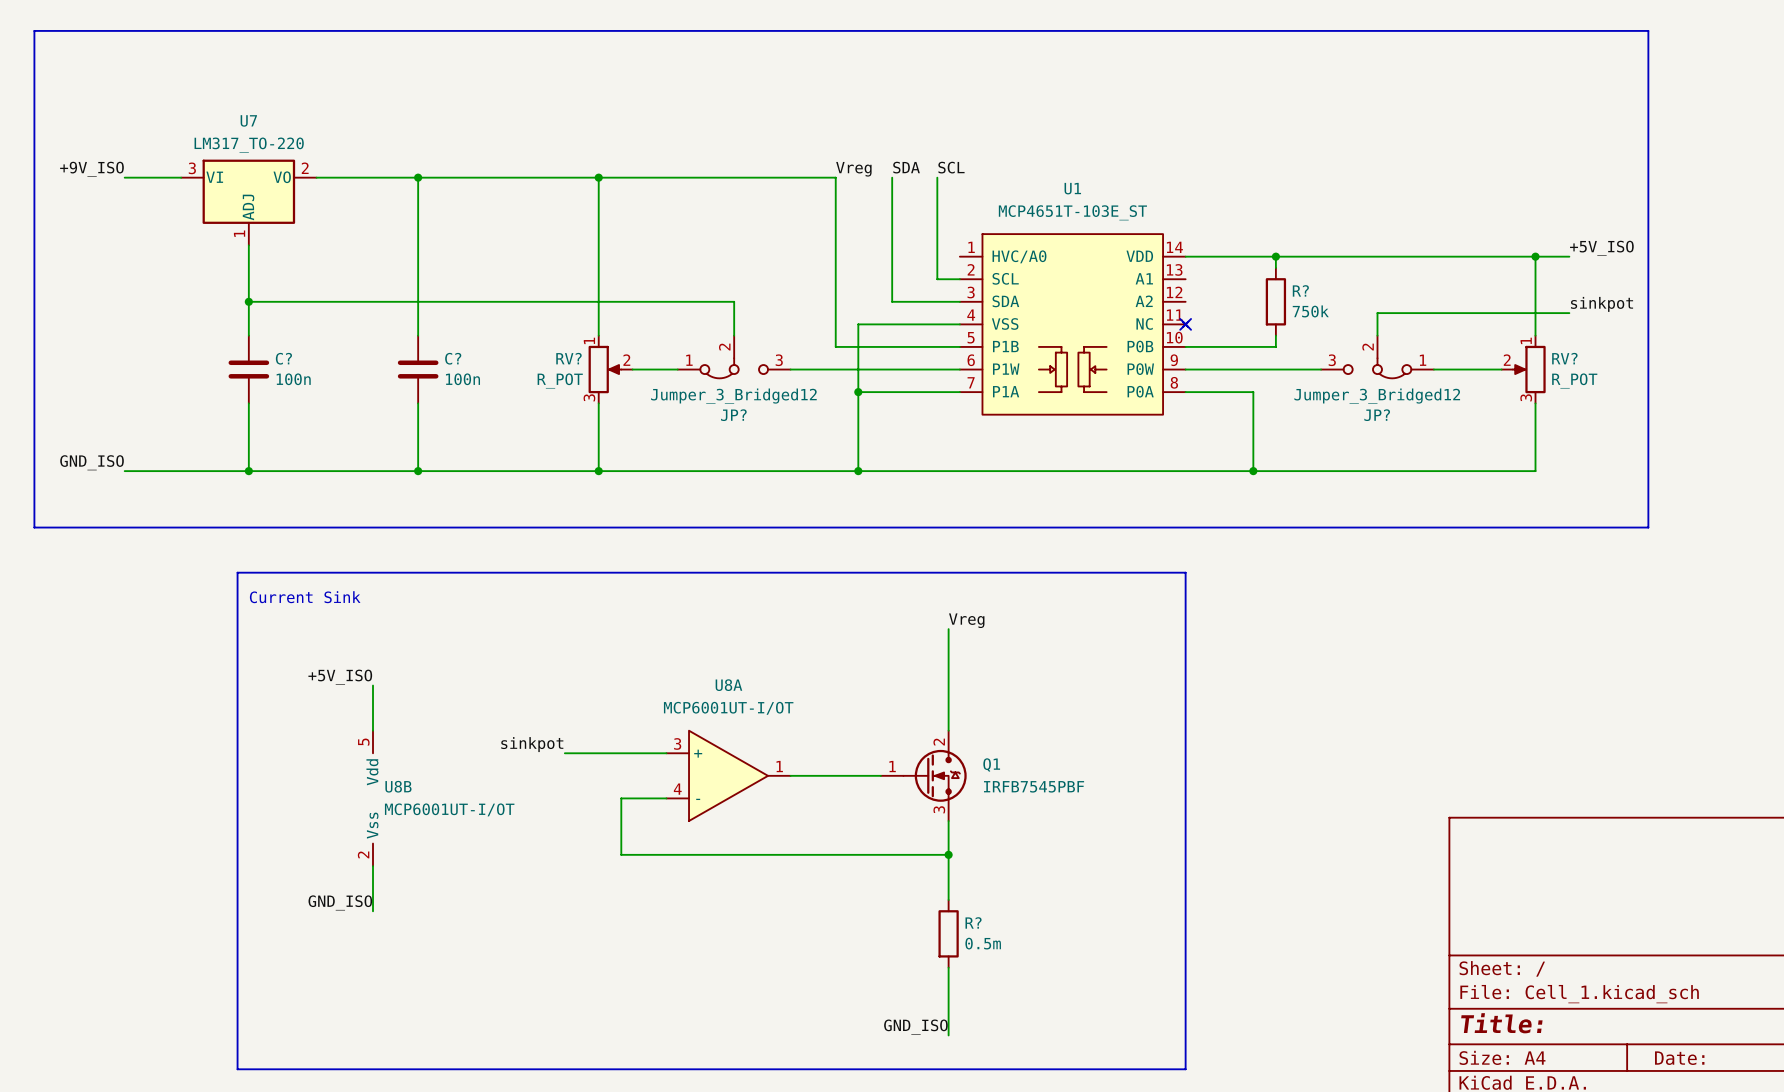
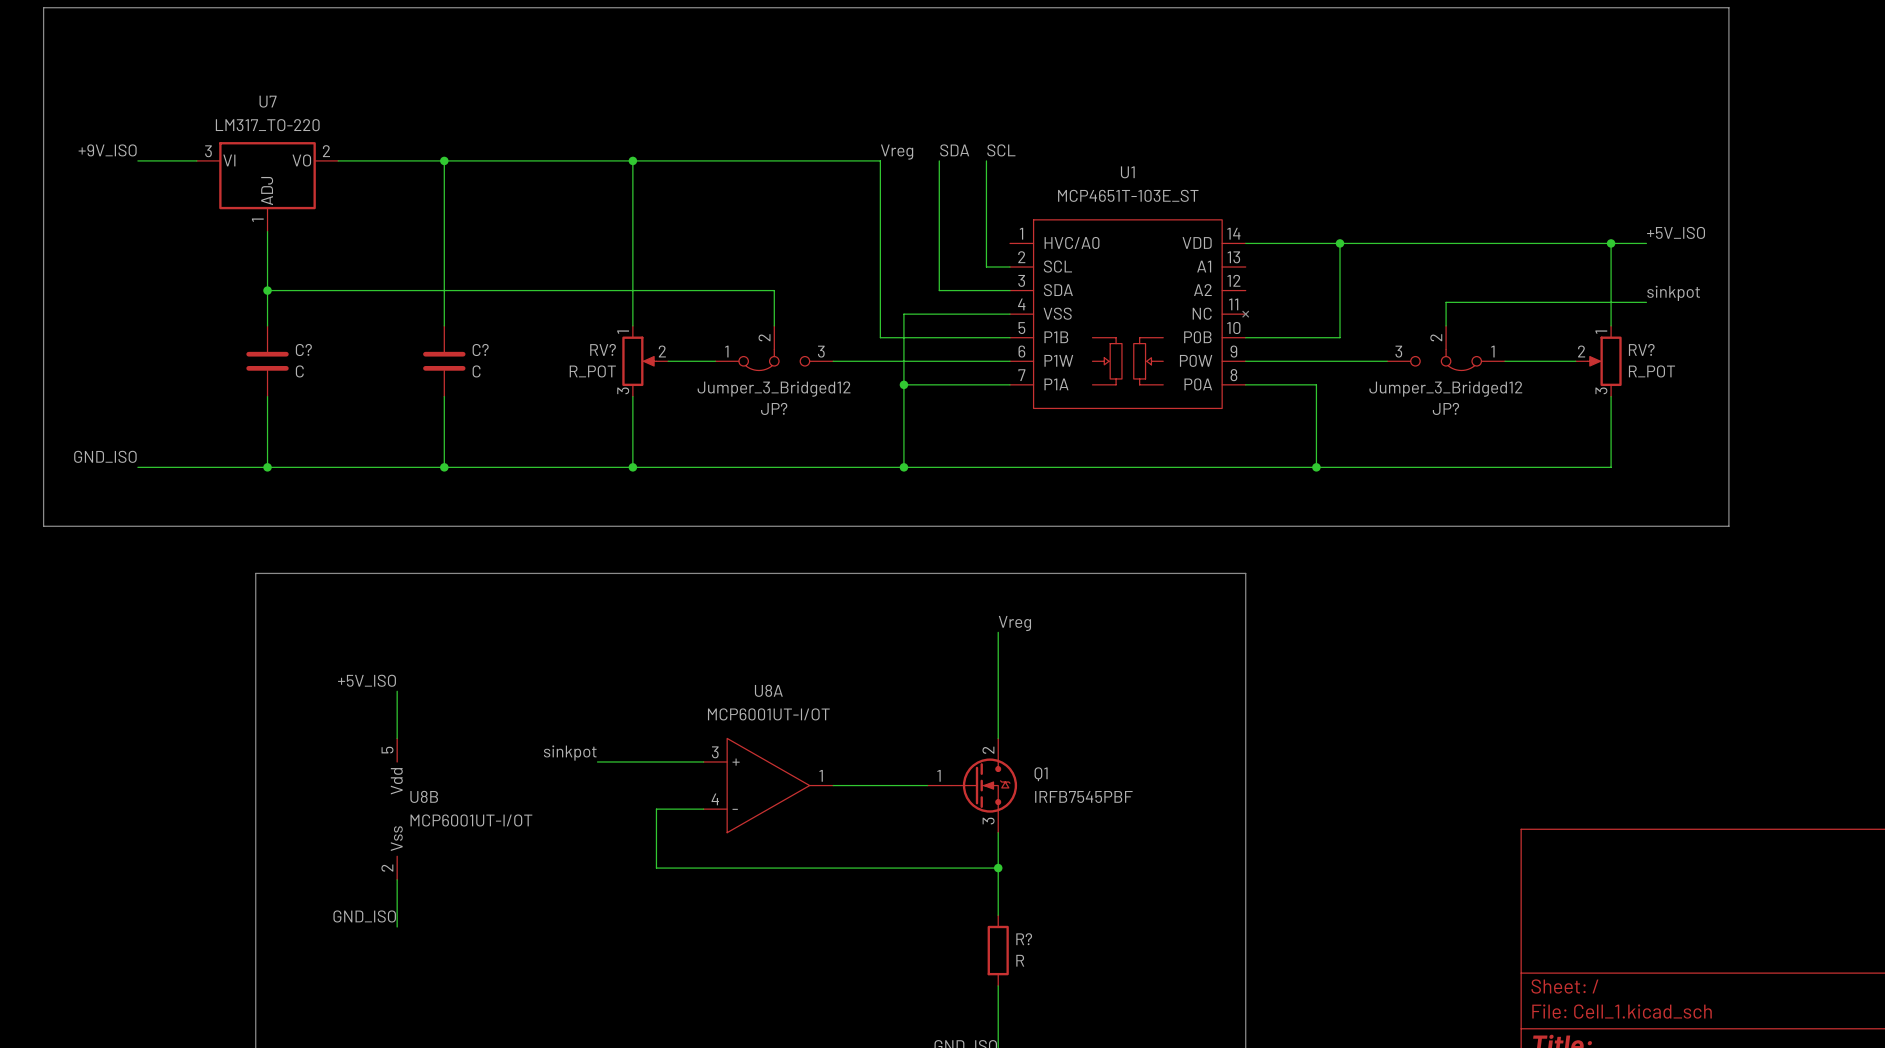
wire: none -> (1340, 255) (1340, 325)
R?: 750k (1275, 301) -> none
no-connect mark: (1185, 324) -> none
C? value: 100n (293, 379) -> C (299, 371)
C? value: 100n (462, 379) -> C (476, 371)
text: Current Sink (305, 597) -> none
R? value: 0.5m (983, 943) -> R (1020, 960)

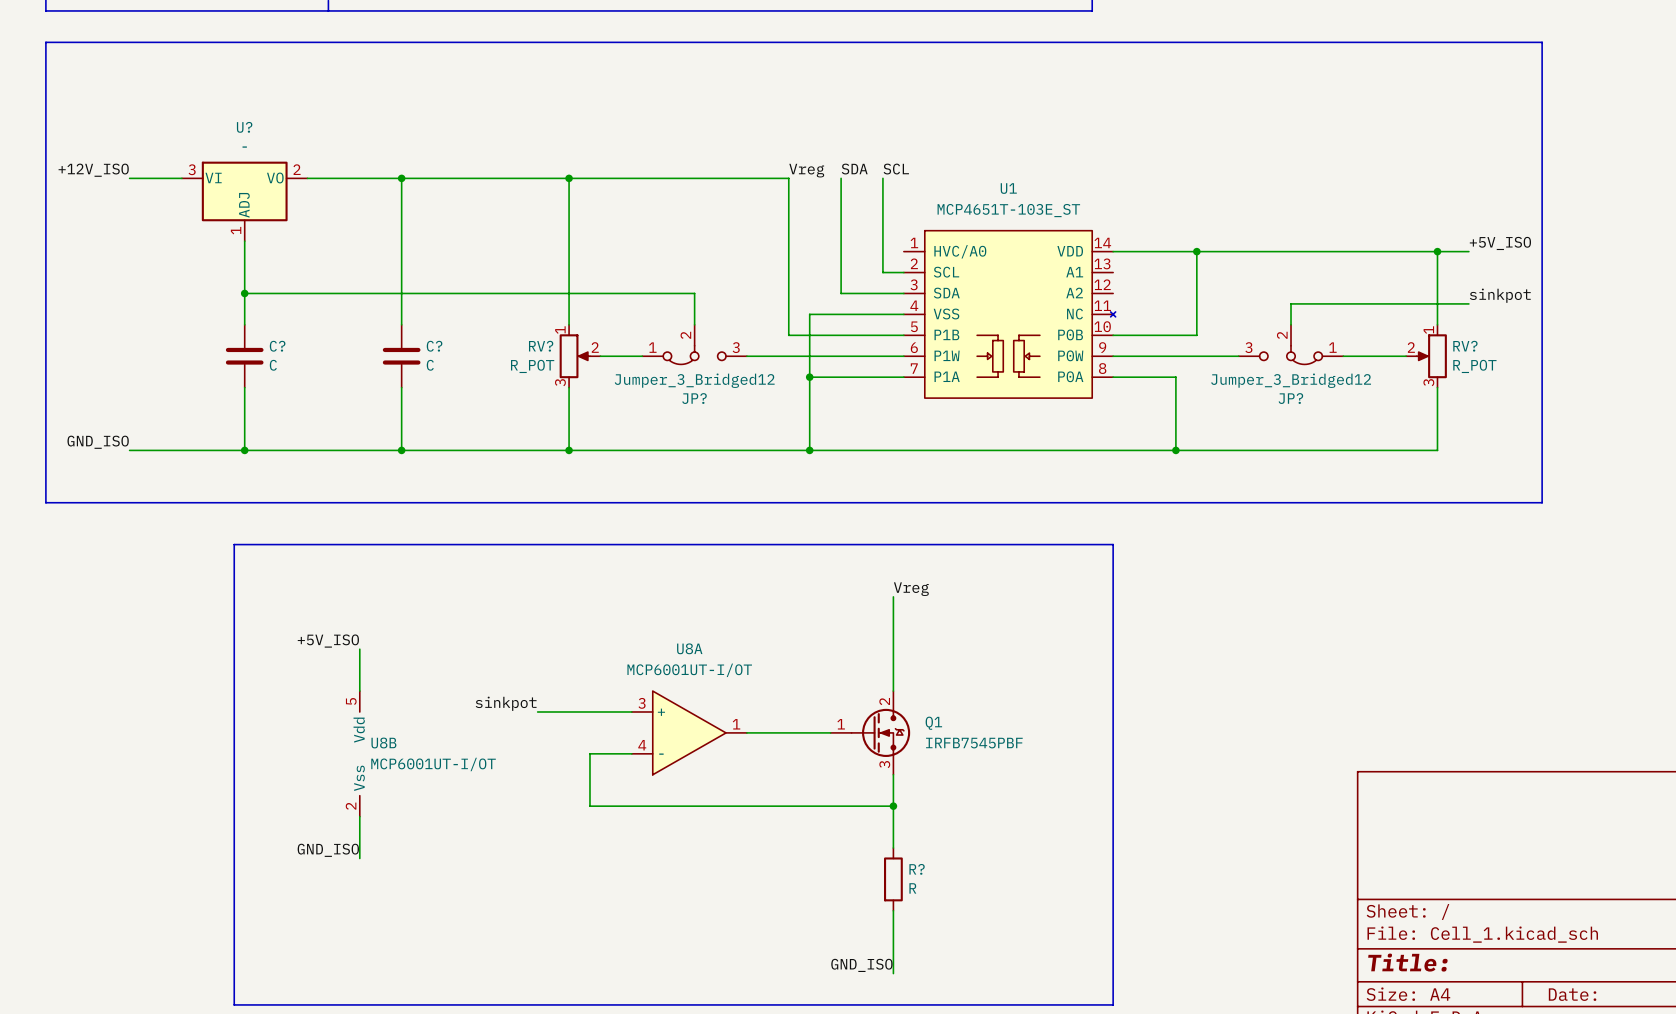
U7 name: U7 (268, 101) -> U? (244, 127)
U7 value: LM317_TO-220 (267, 125) -> - (244, 147)
label: +9V_ISO (107, 150) -> +12V_ISO (93, 170)

